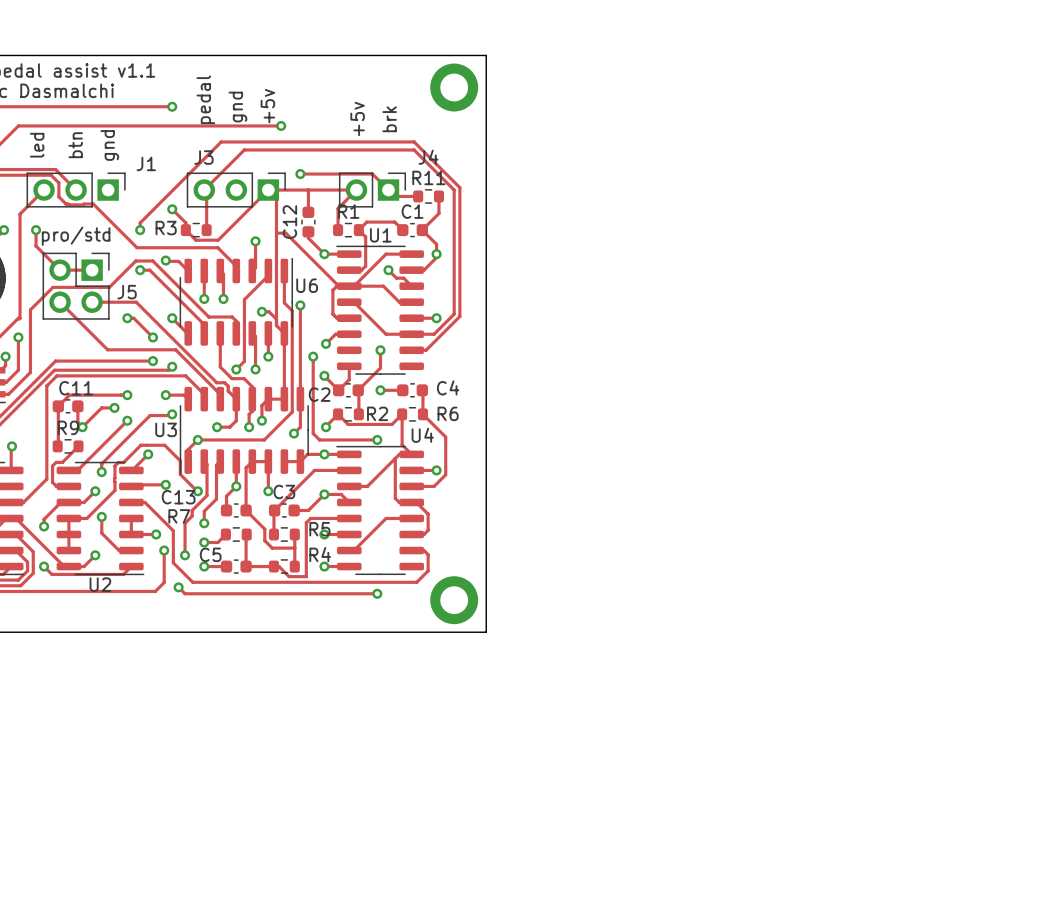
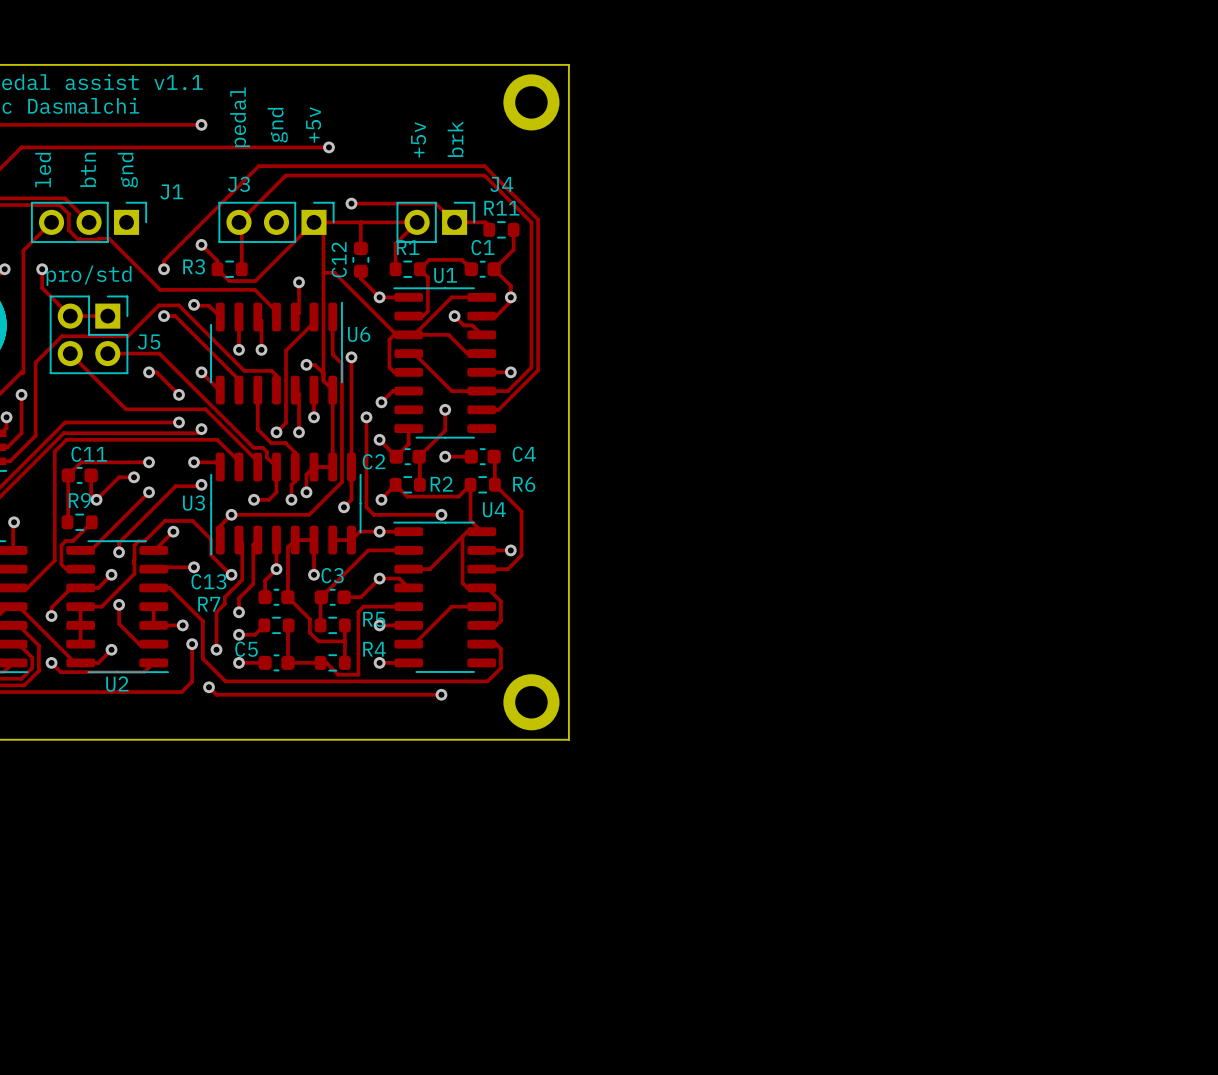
track: none -> (454, 222) (485, 222) (493, 229)
track: (394, 196) (418, 196) -> none

